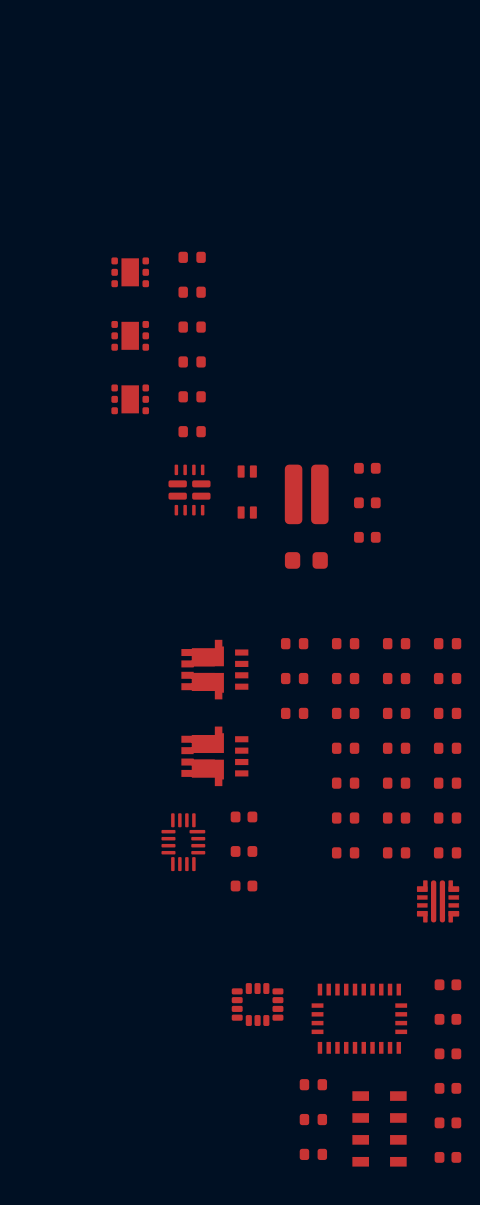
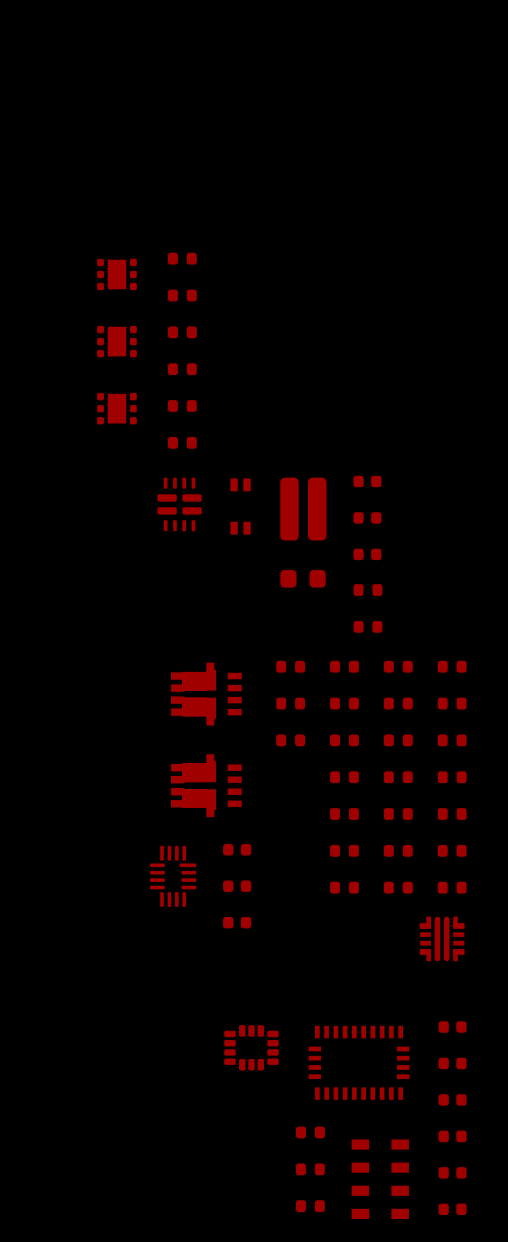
part: none -> (367, 590)
part: none -> (367, 626)

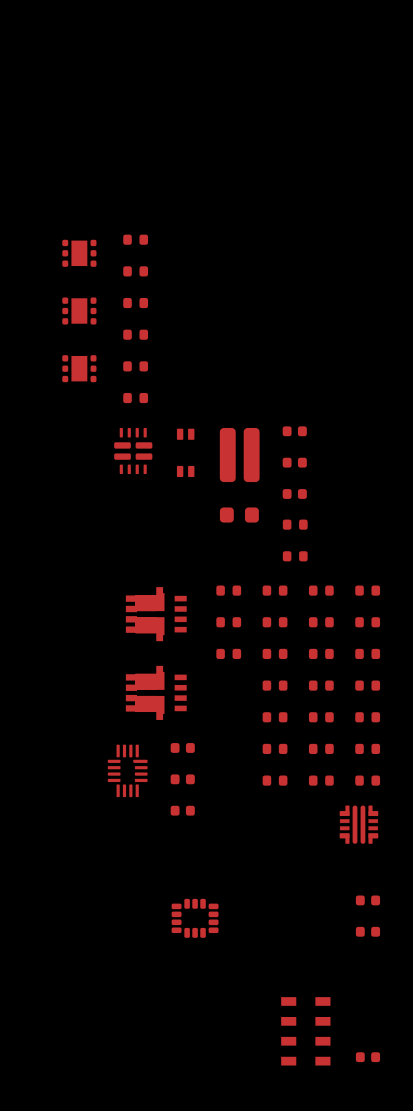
part: (359, 1062) -> none
part: (452, 1099) -> none
part: (310, 1132) -> none
part: (452, 1136) -> none
part: (310, 1169) -> none
part: (452, 1172) -> none
part: (310, 1206) -> none

